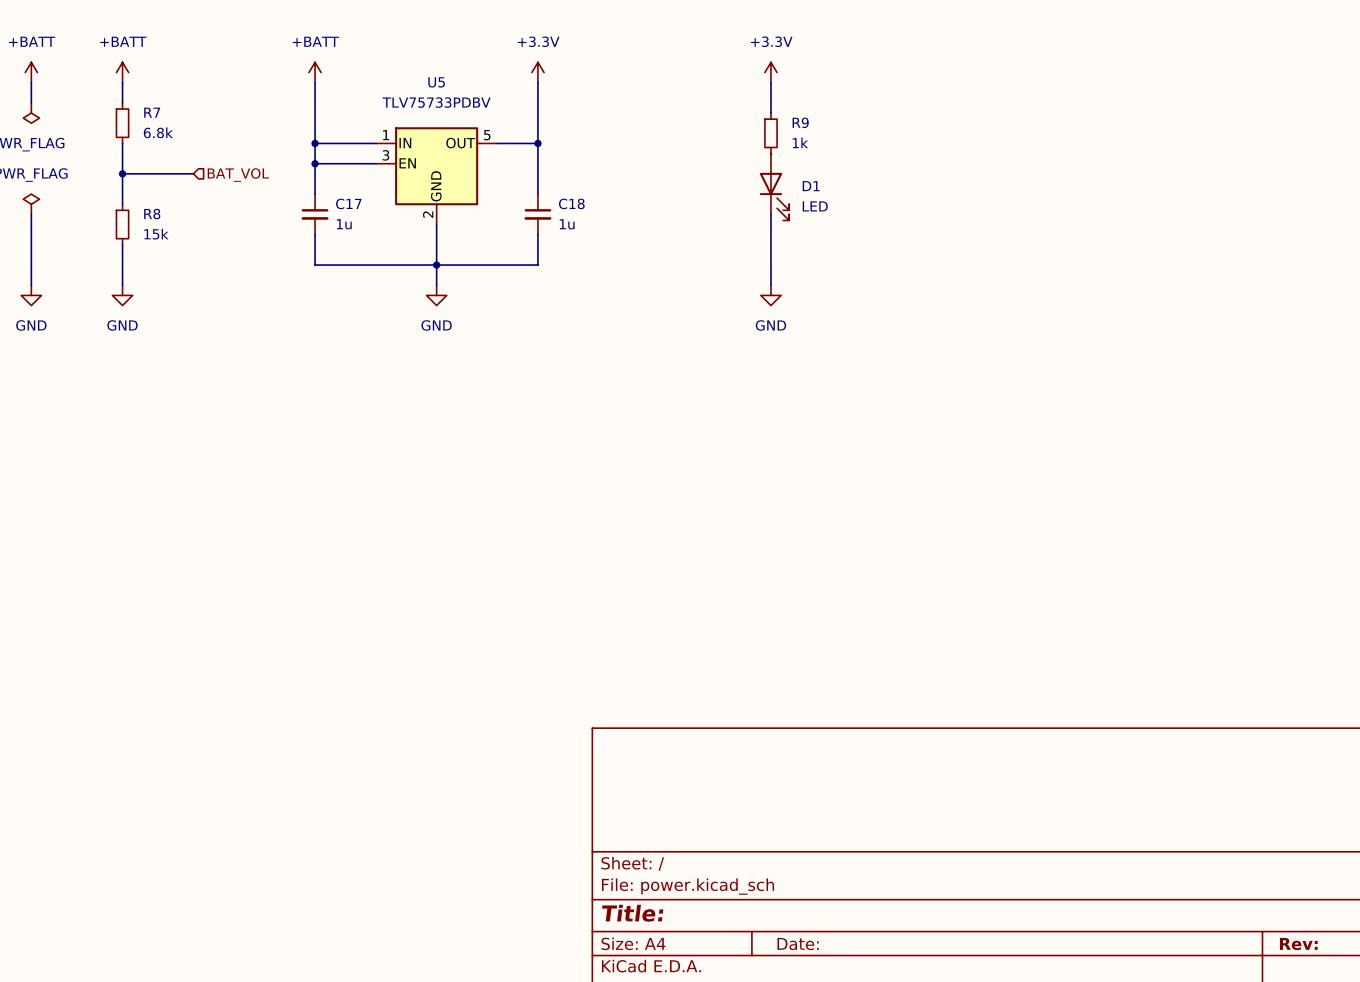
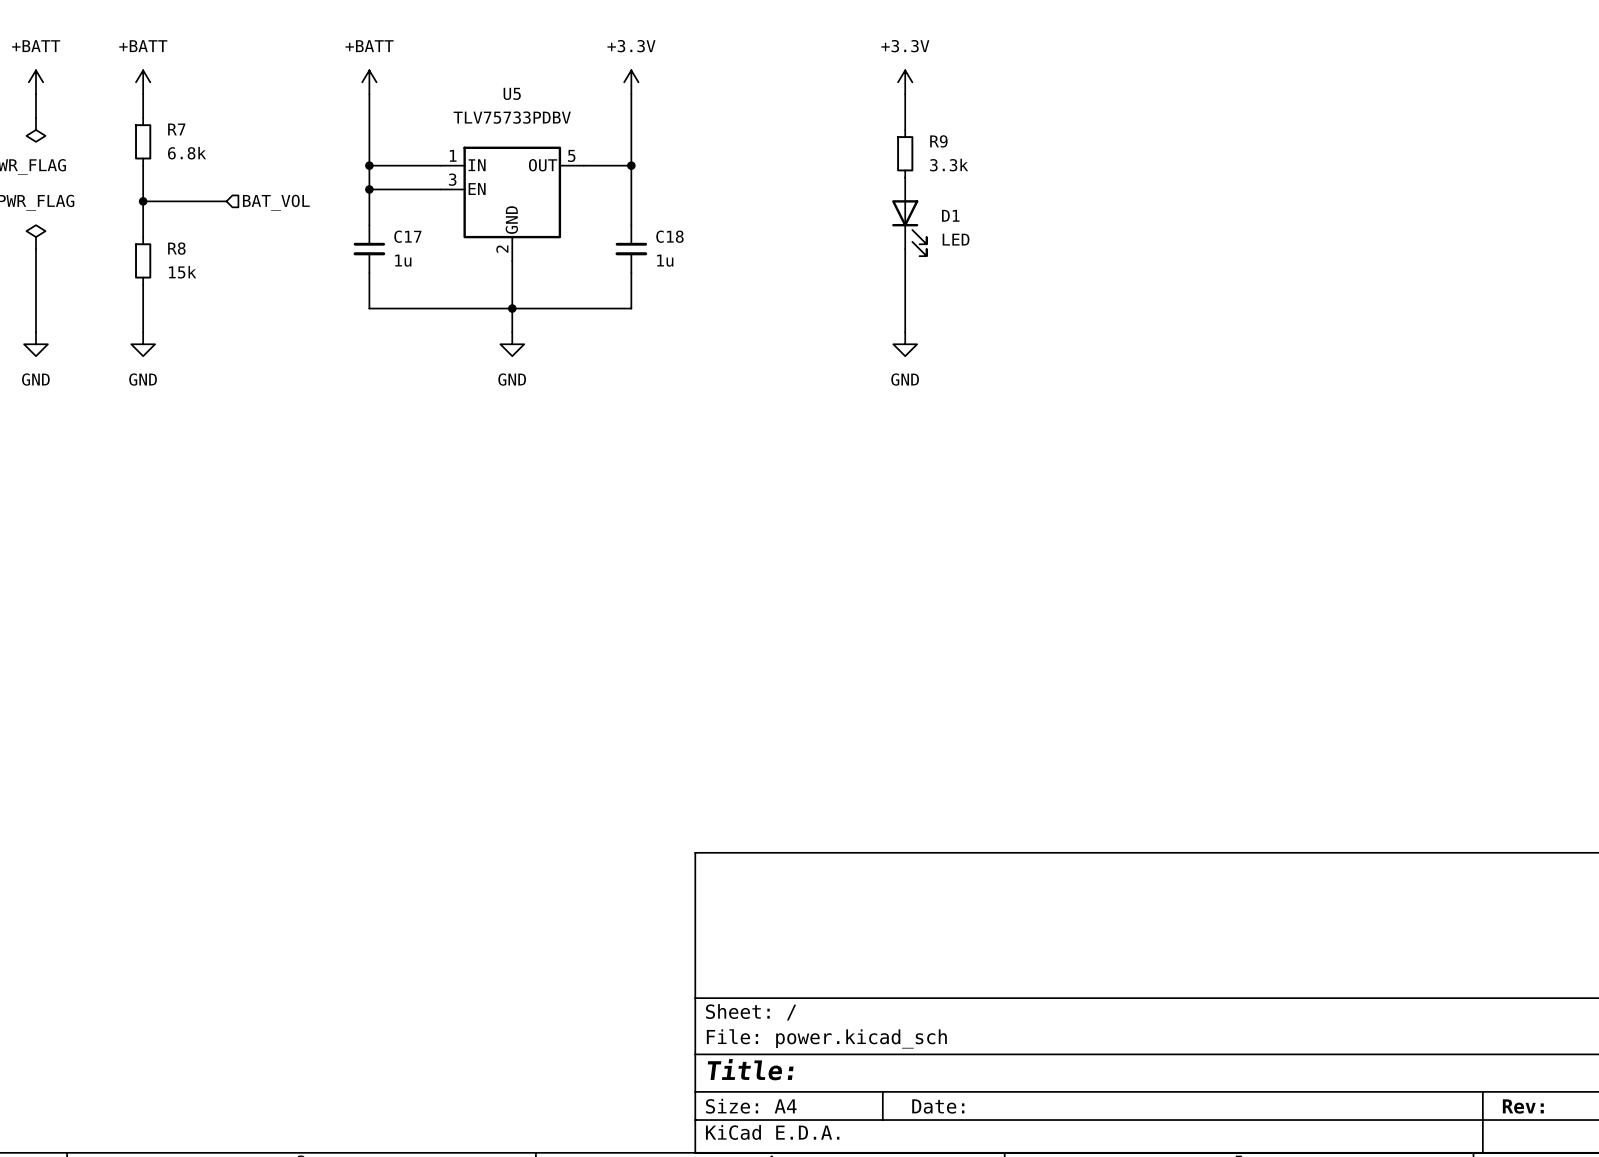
R9 value: 1k (800, 142) -> 3.3k (949, 165)

